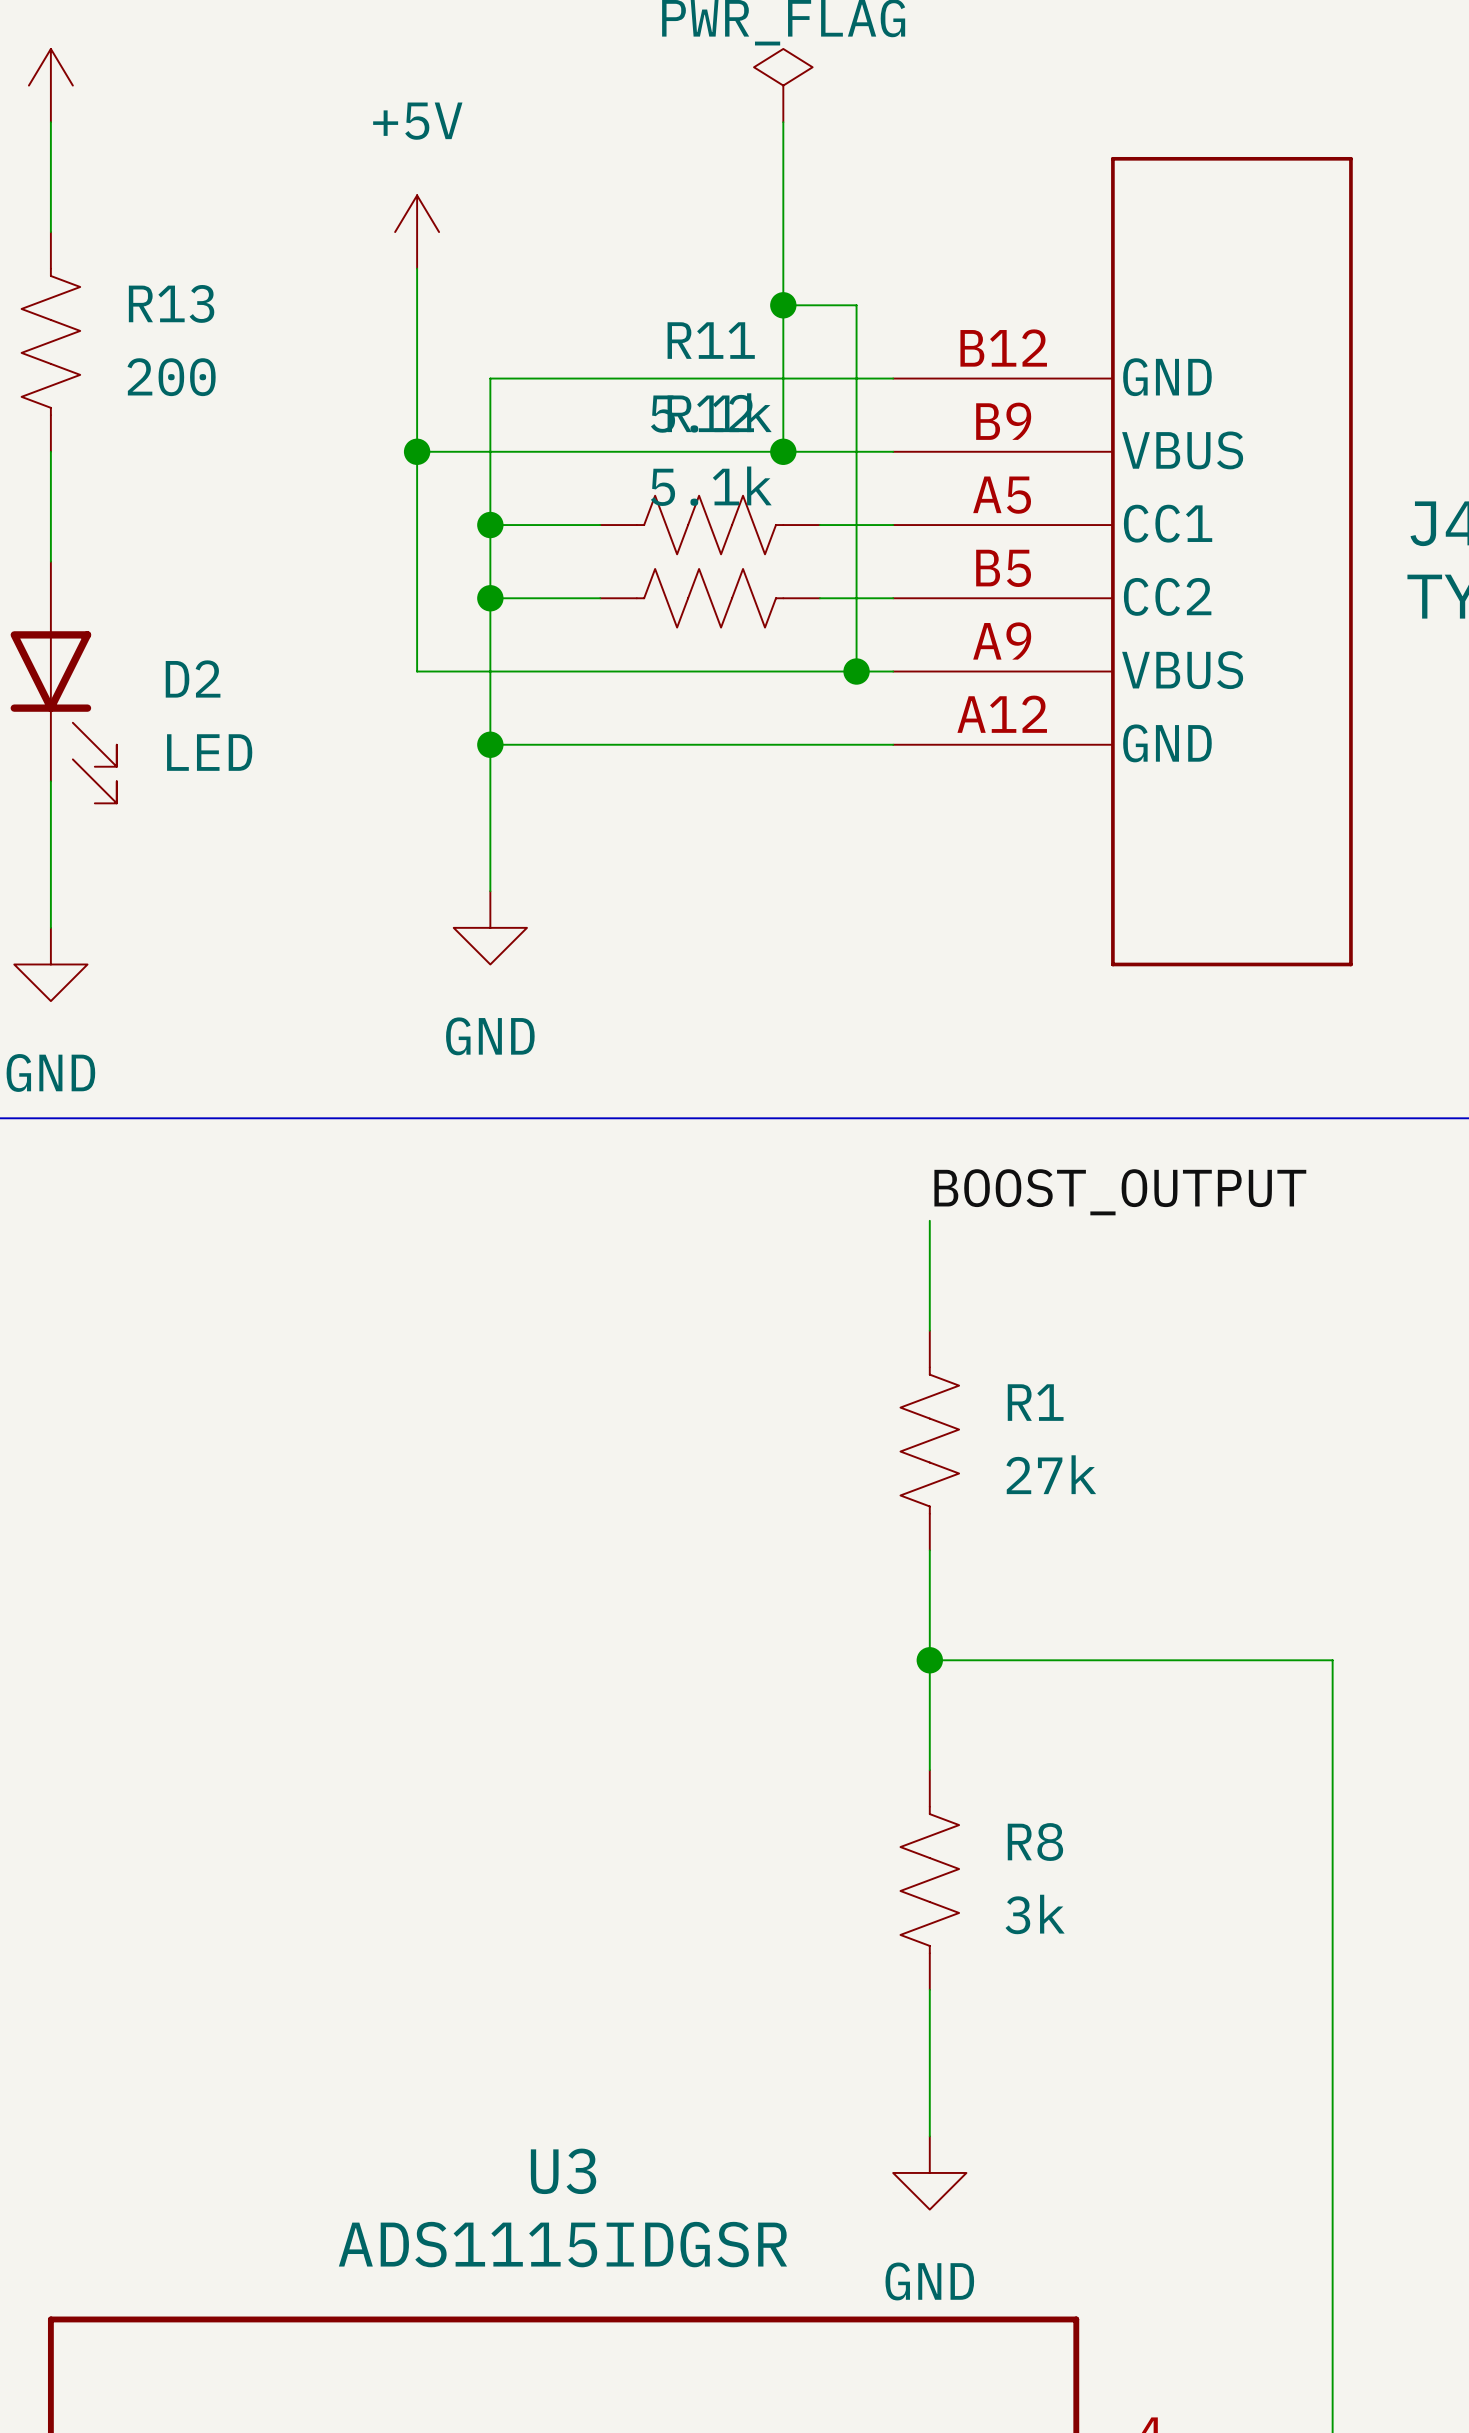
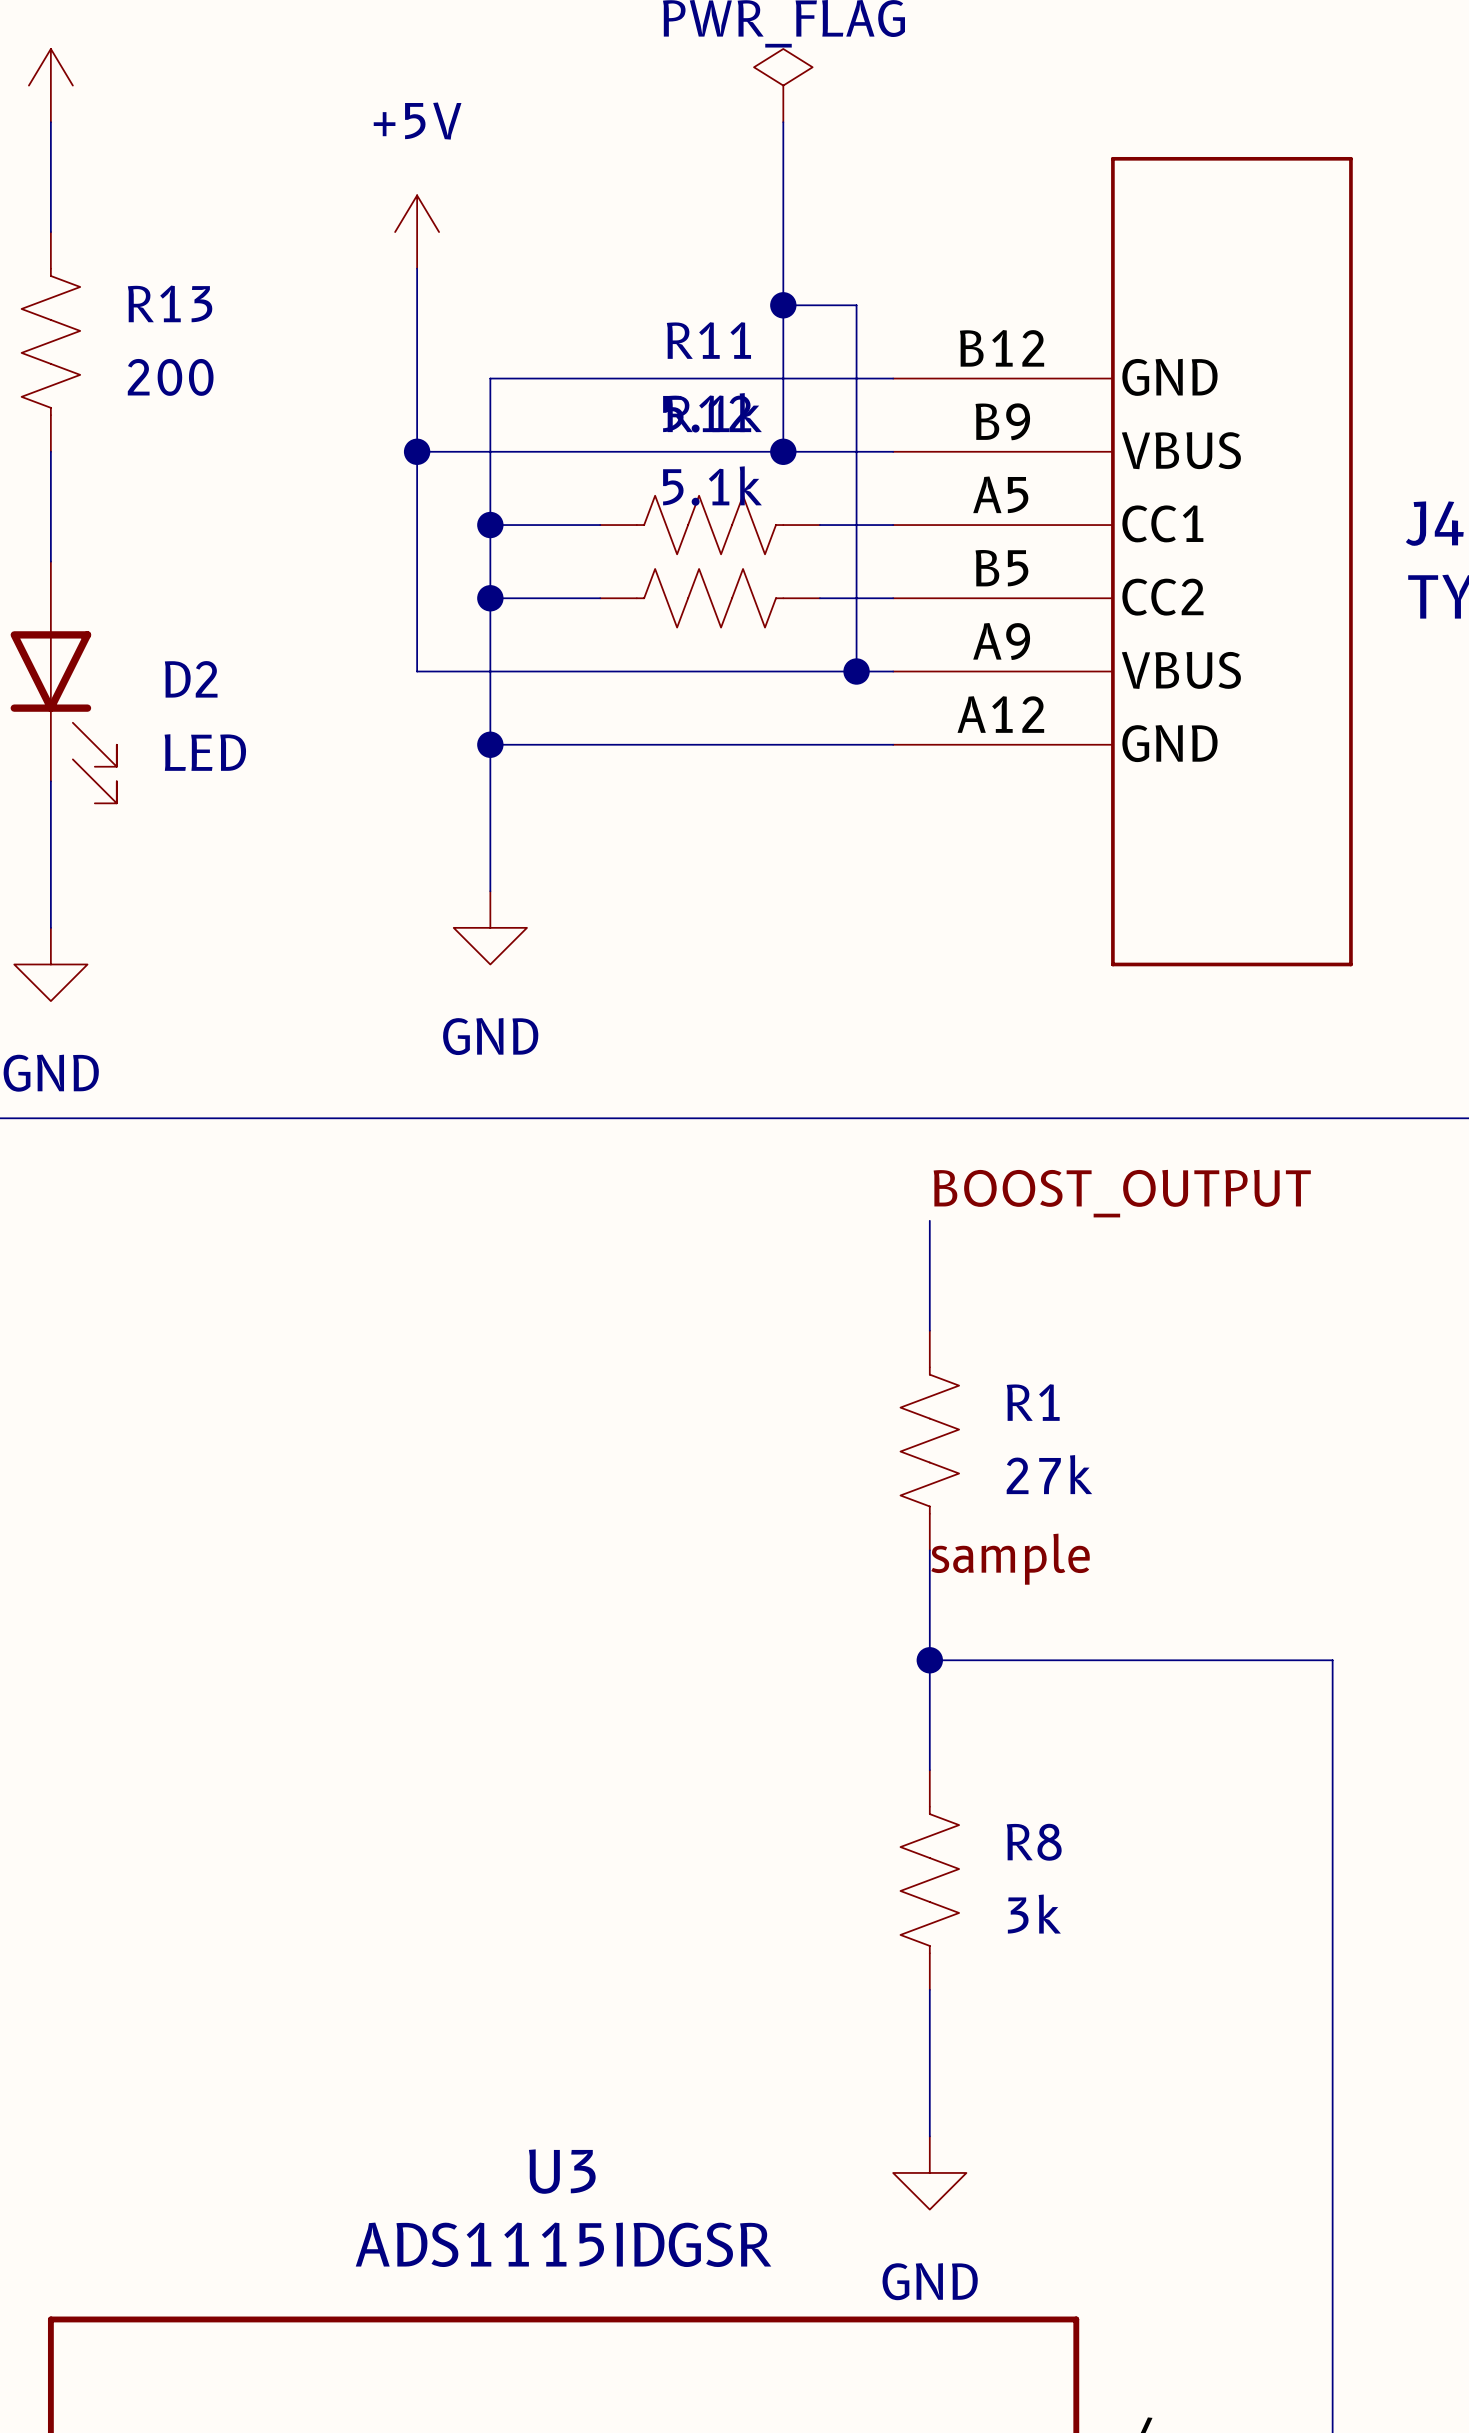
label: none -> sample (1010, 1559)

